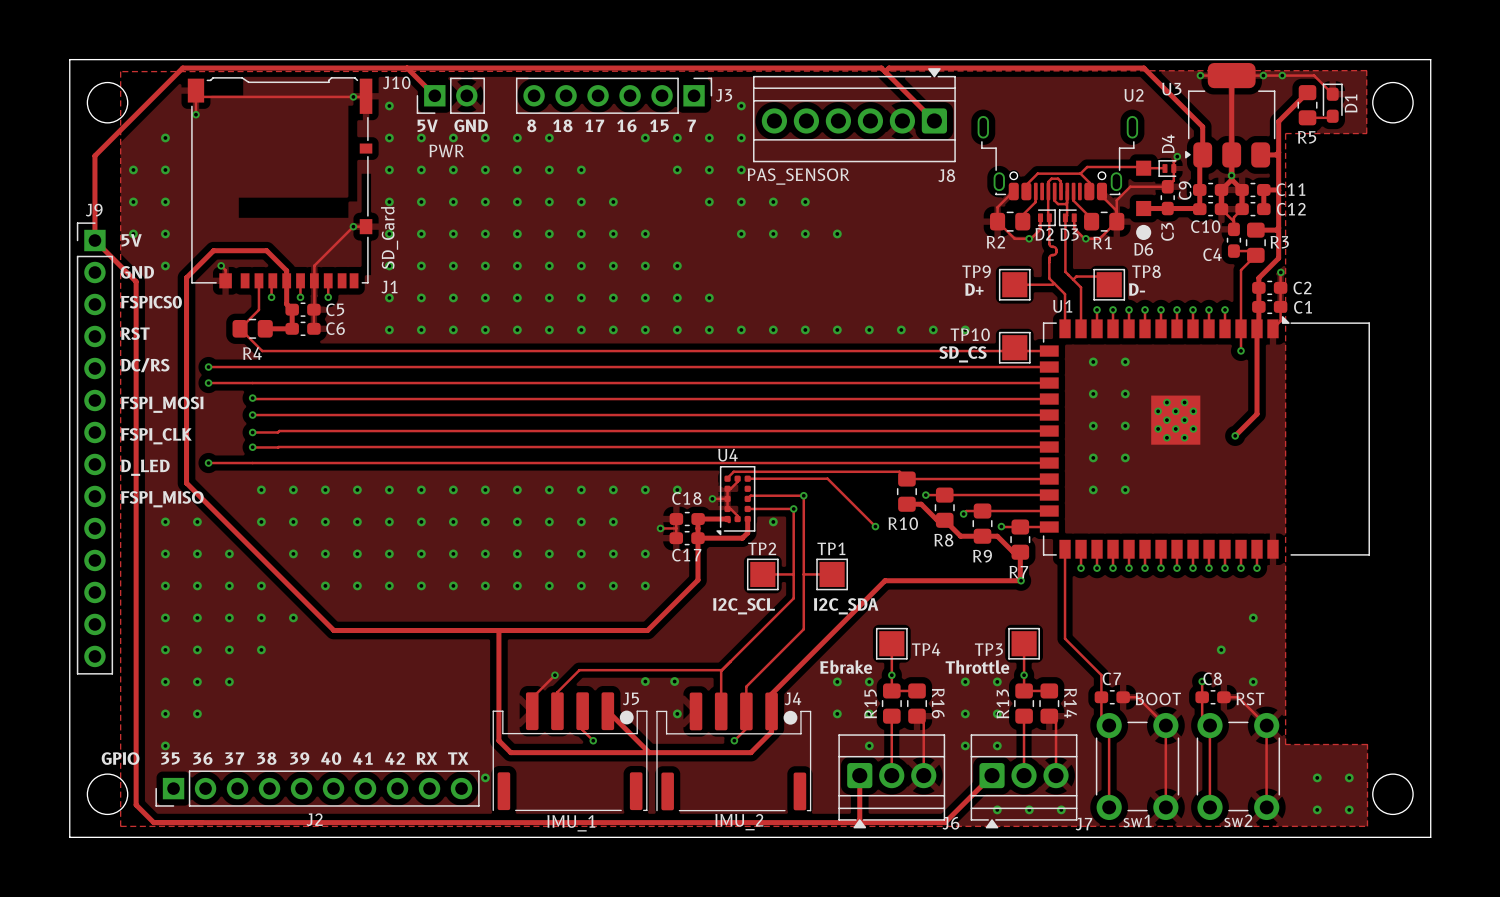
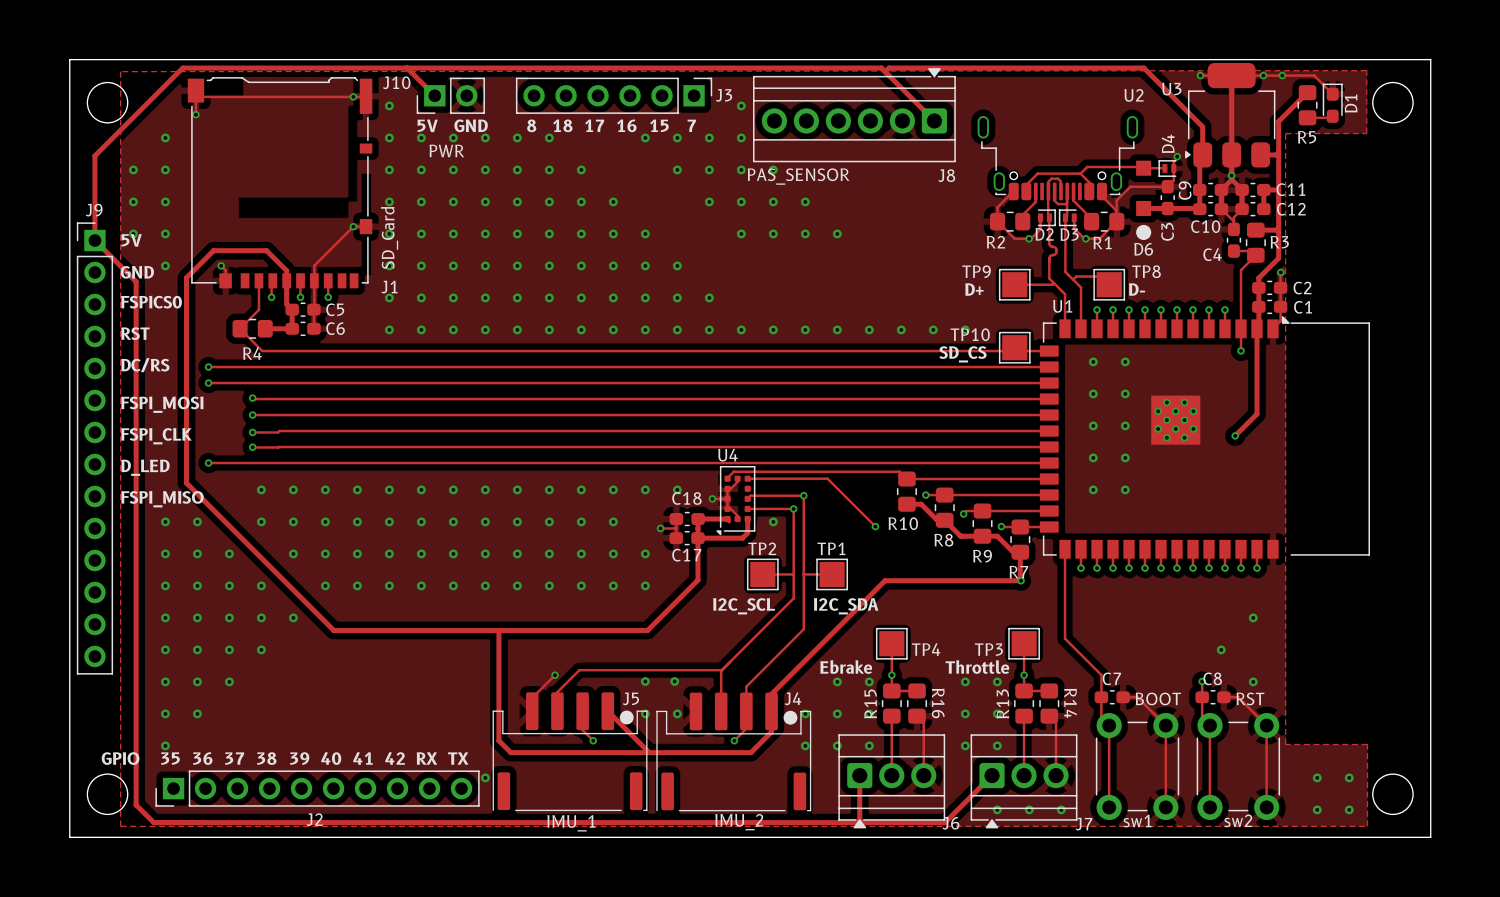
via: none -> (773, 169)
via: none -> (645, 713)
via: none -> (805, 713)
via: none -> (805, 745)
via: none -> (837, 745)

